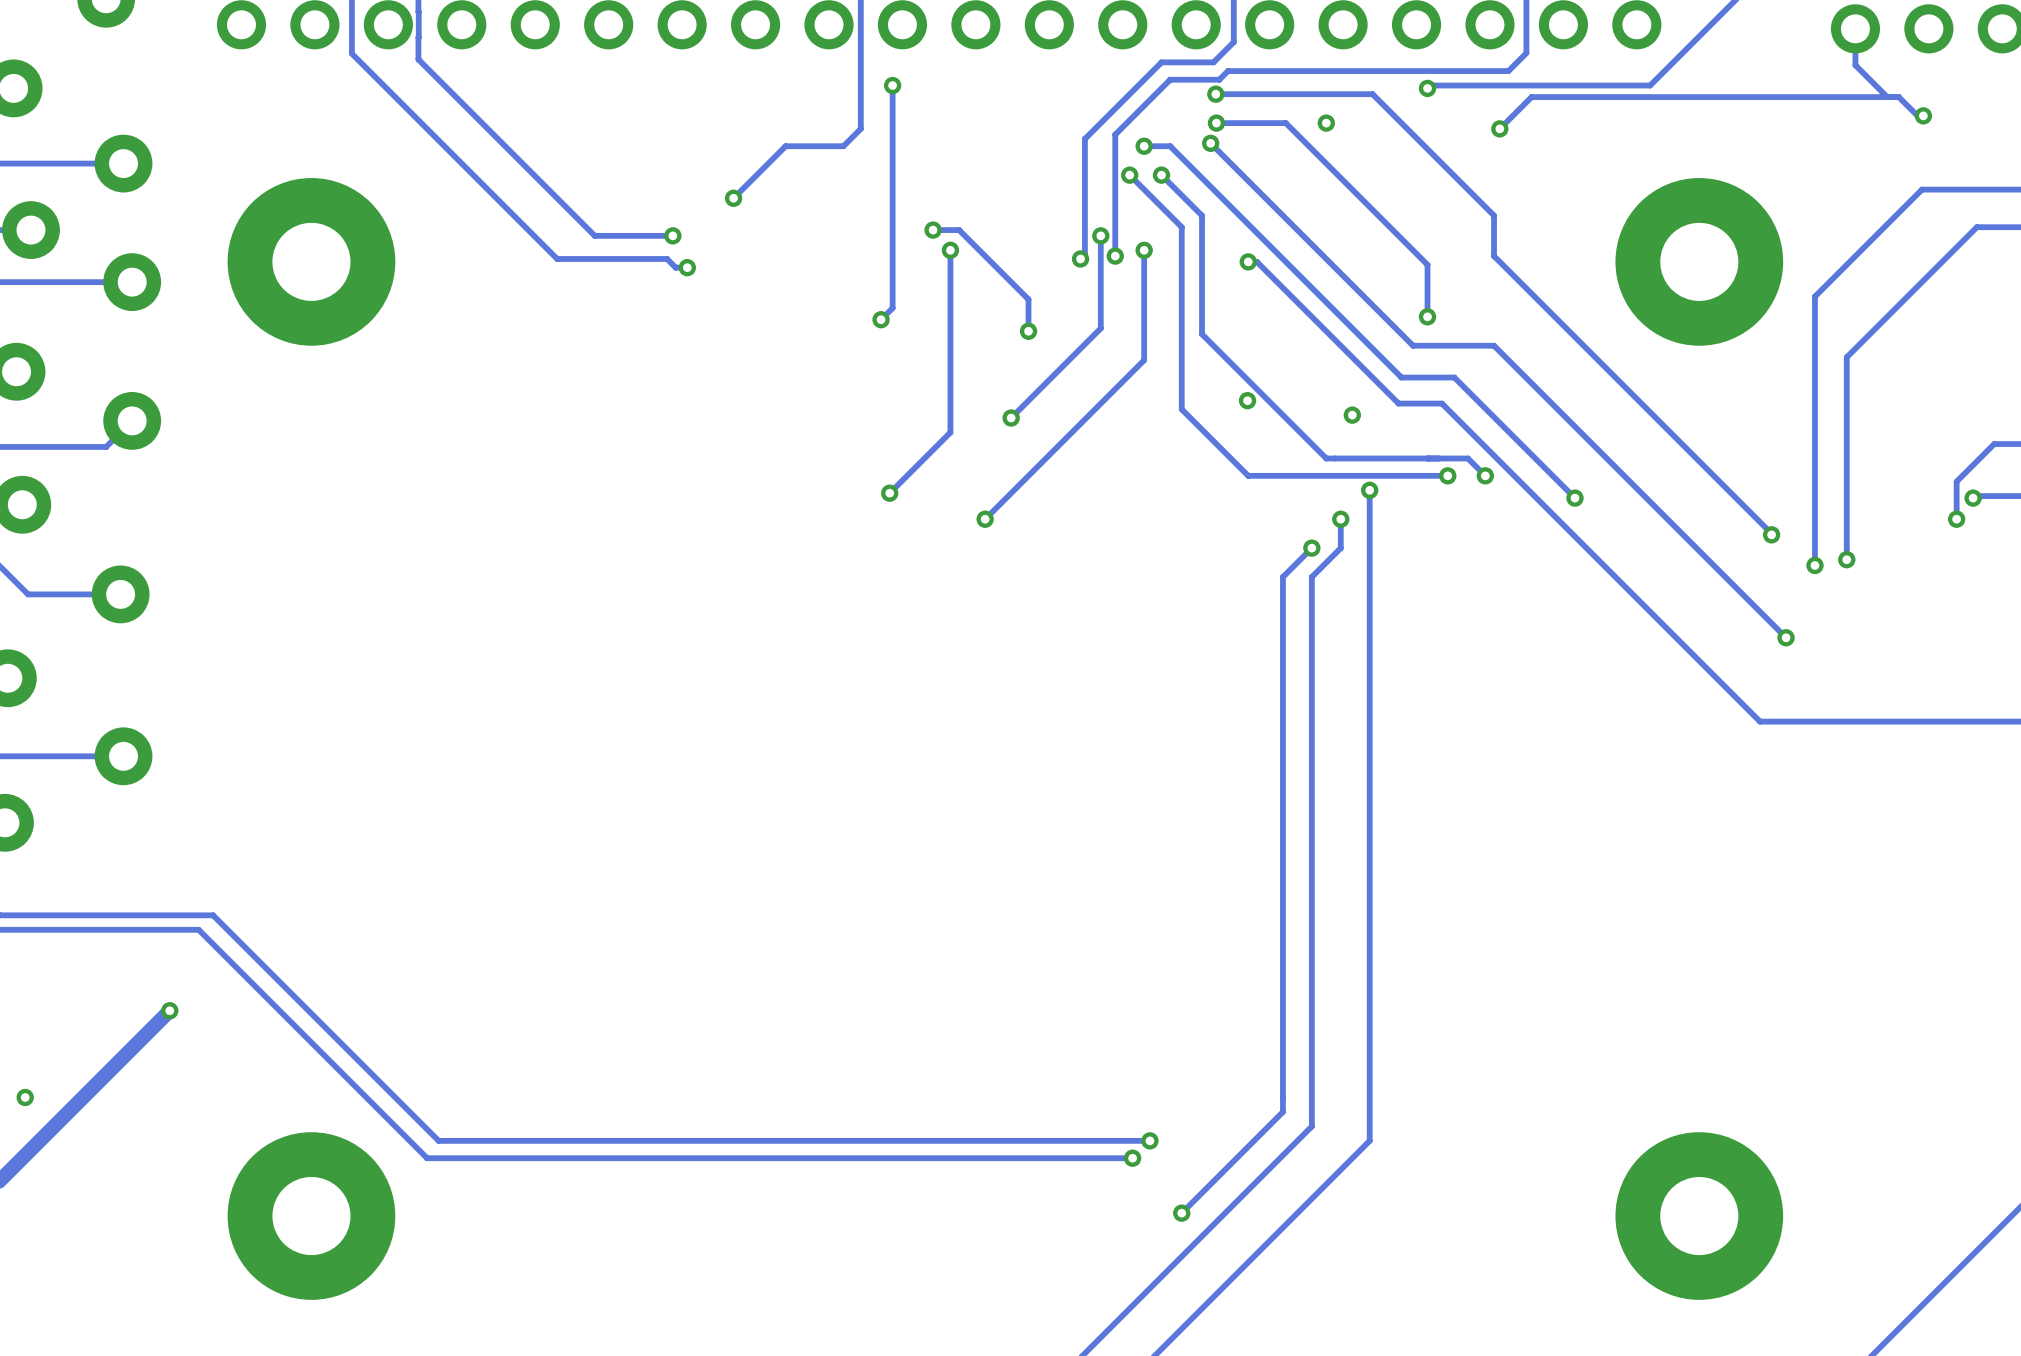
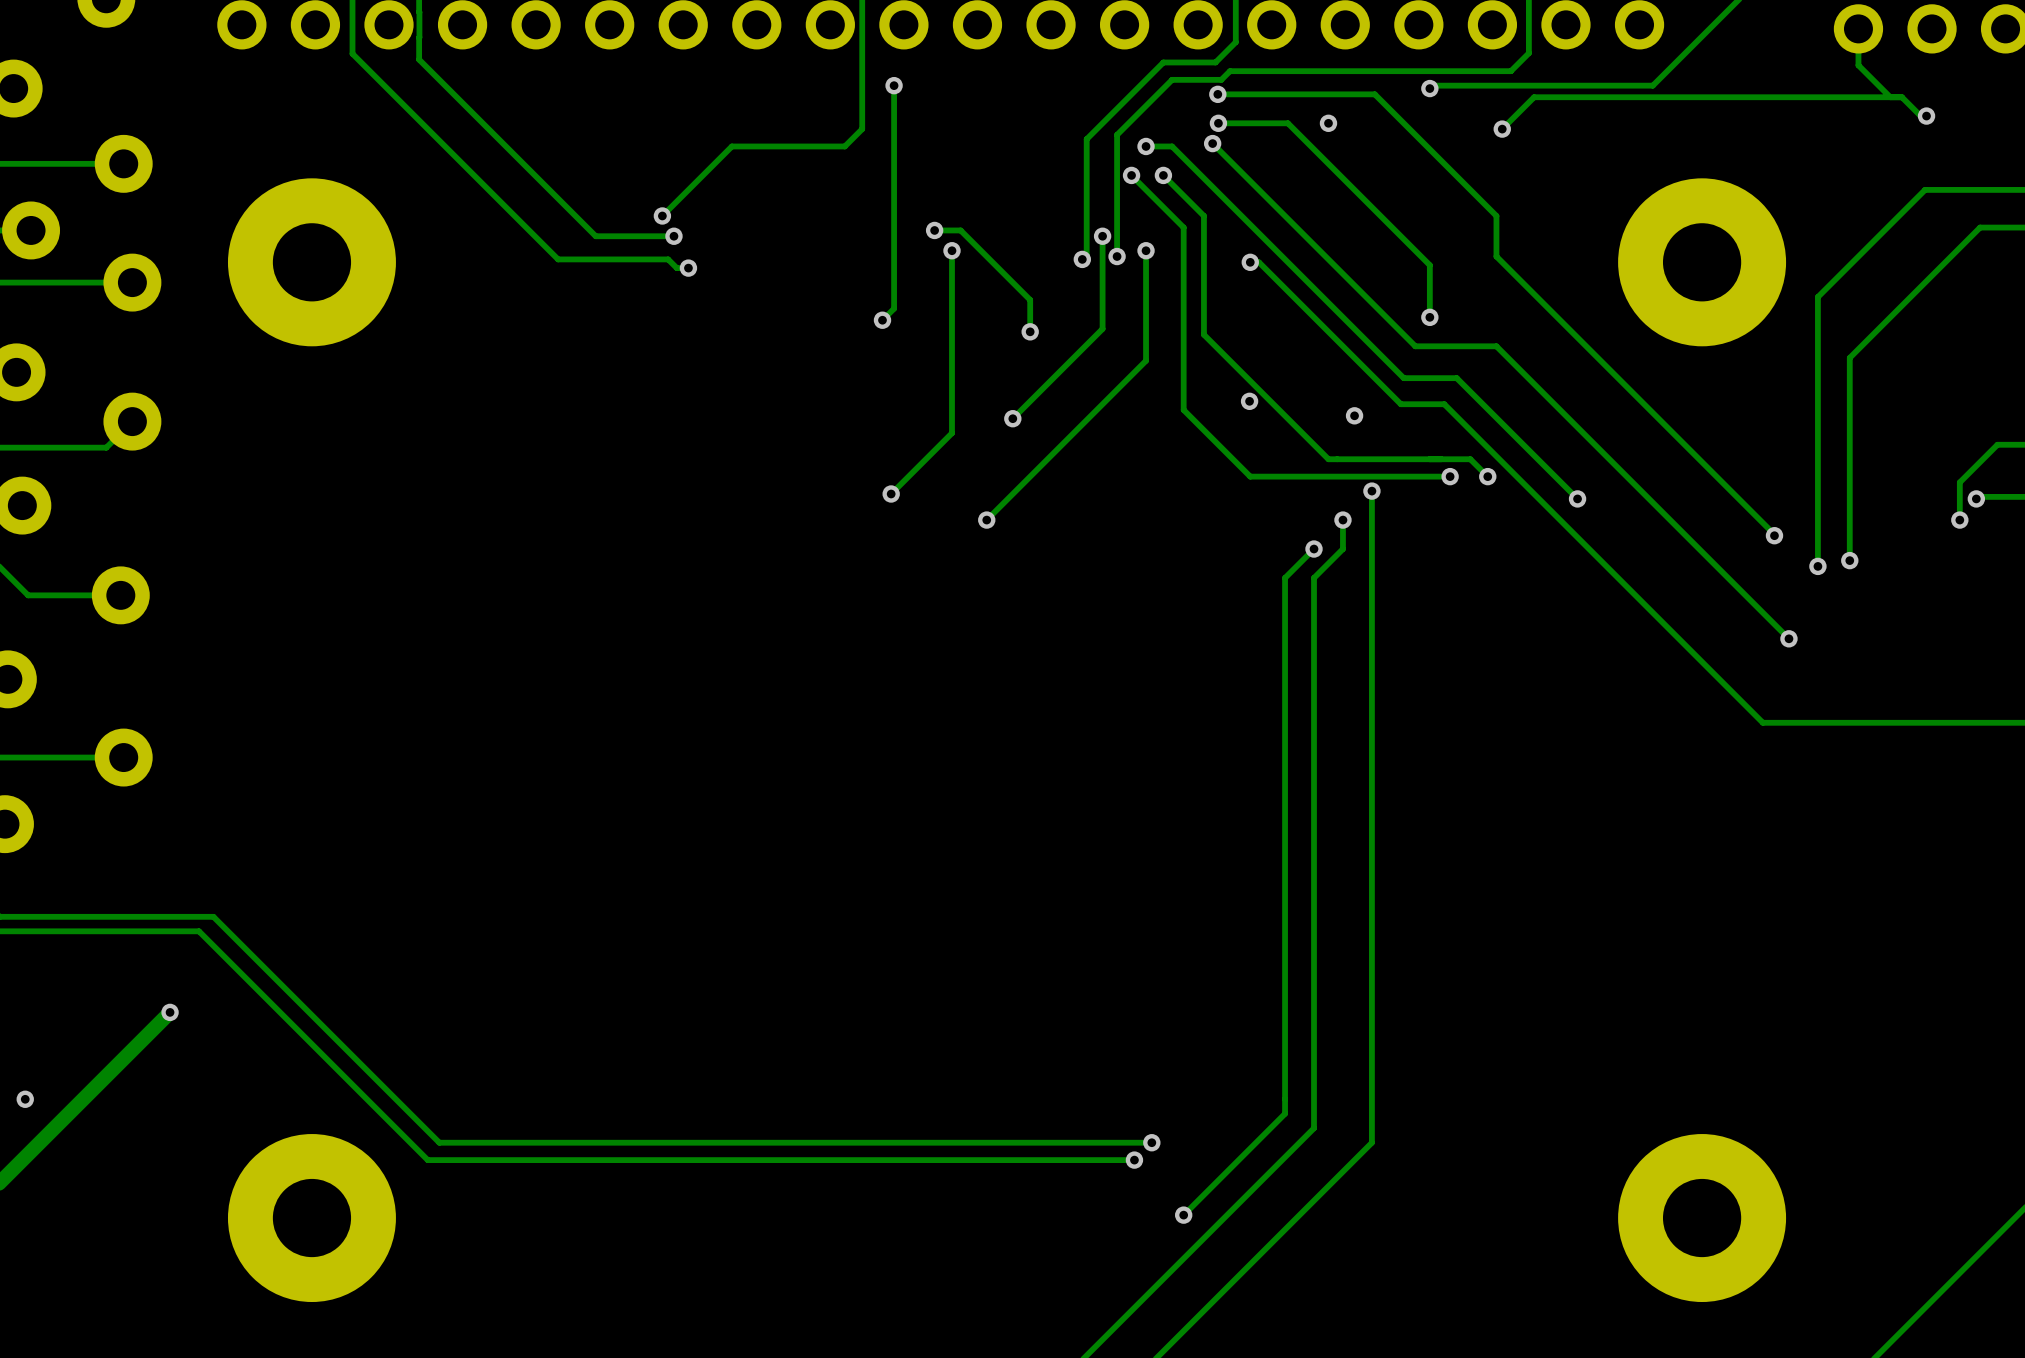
track: (785, 146) (733, 198) -> (786, 146) (731, 146) (662, 215)
via position: (733, 198) -> (662, 215)

